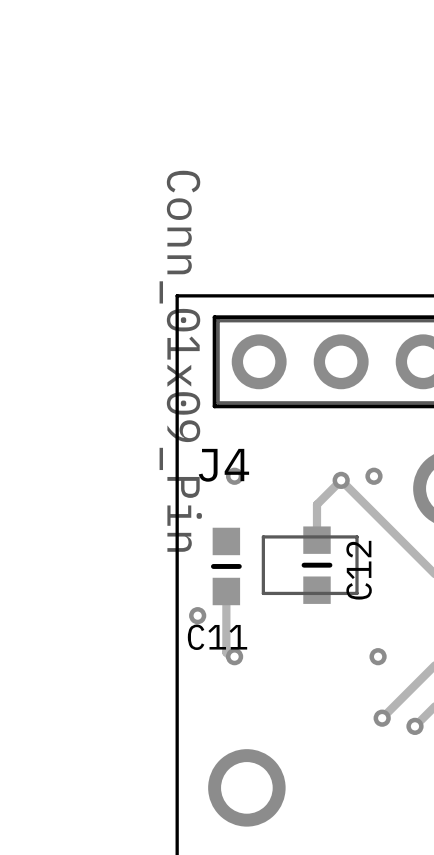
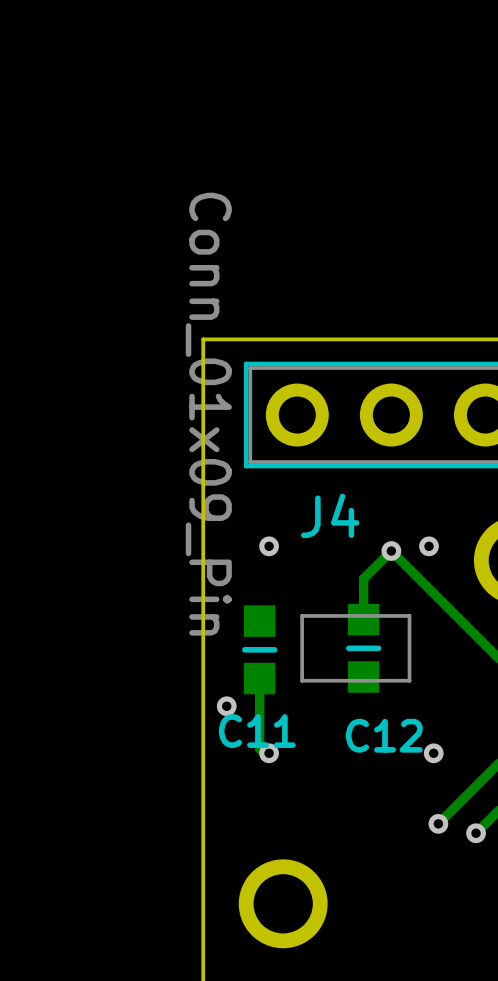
J4 name position: J4 (223, 465) -> J4 (330, 515)
C12 name rotation: 0° (359, 570) -> 90° clockwise (384, 735)
C12 name position: C12 (359, 570) -> C12 (384, 735)

